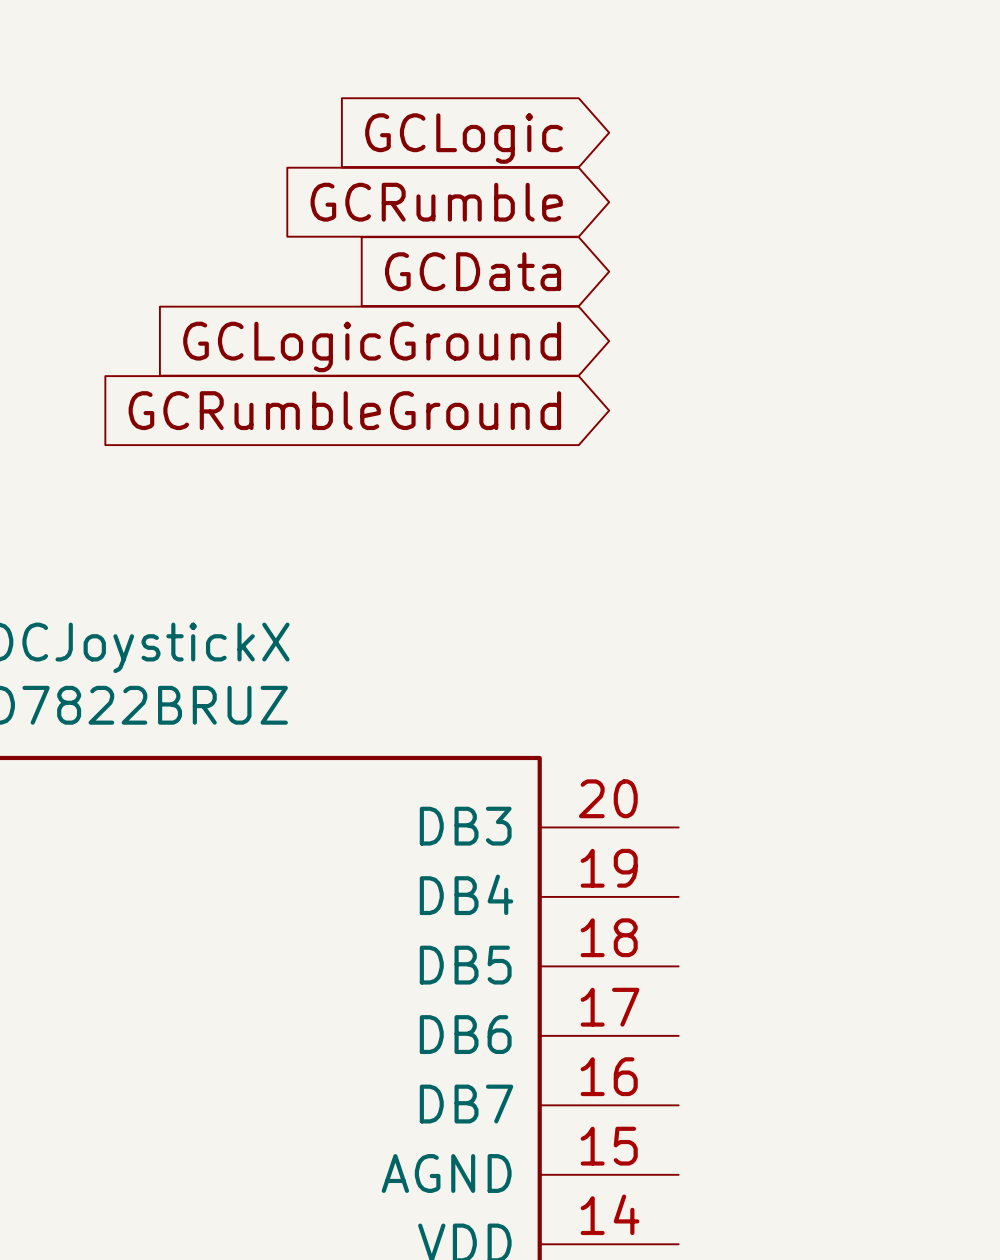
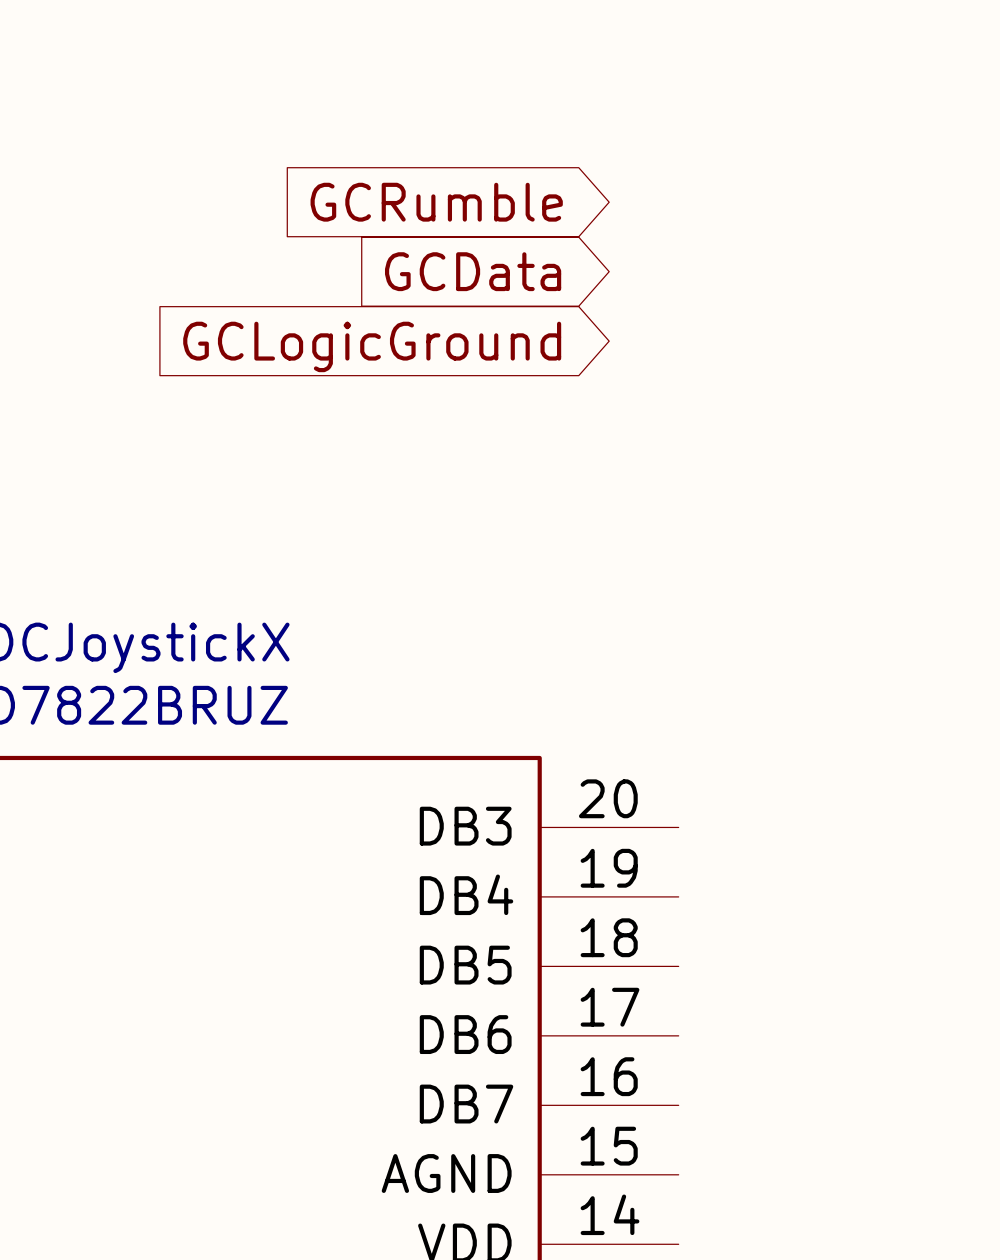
global label: GCLogic (463, 138) -> none
global label: GCRumbleGround (344, 410) -> none

